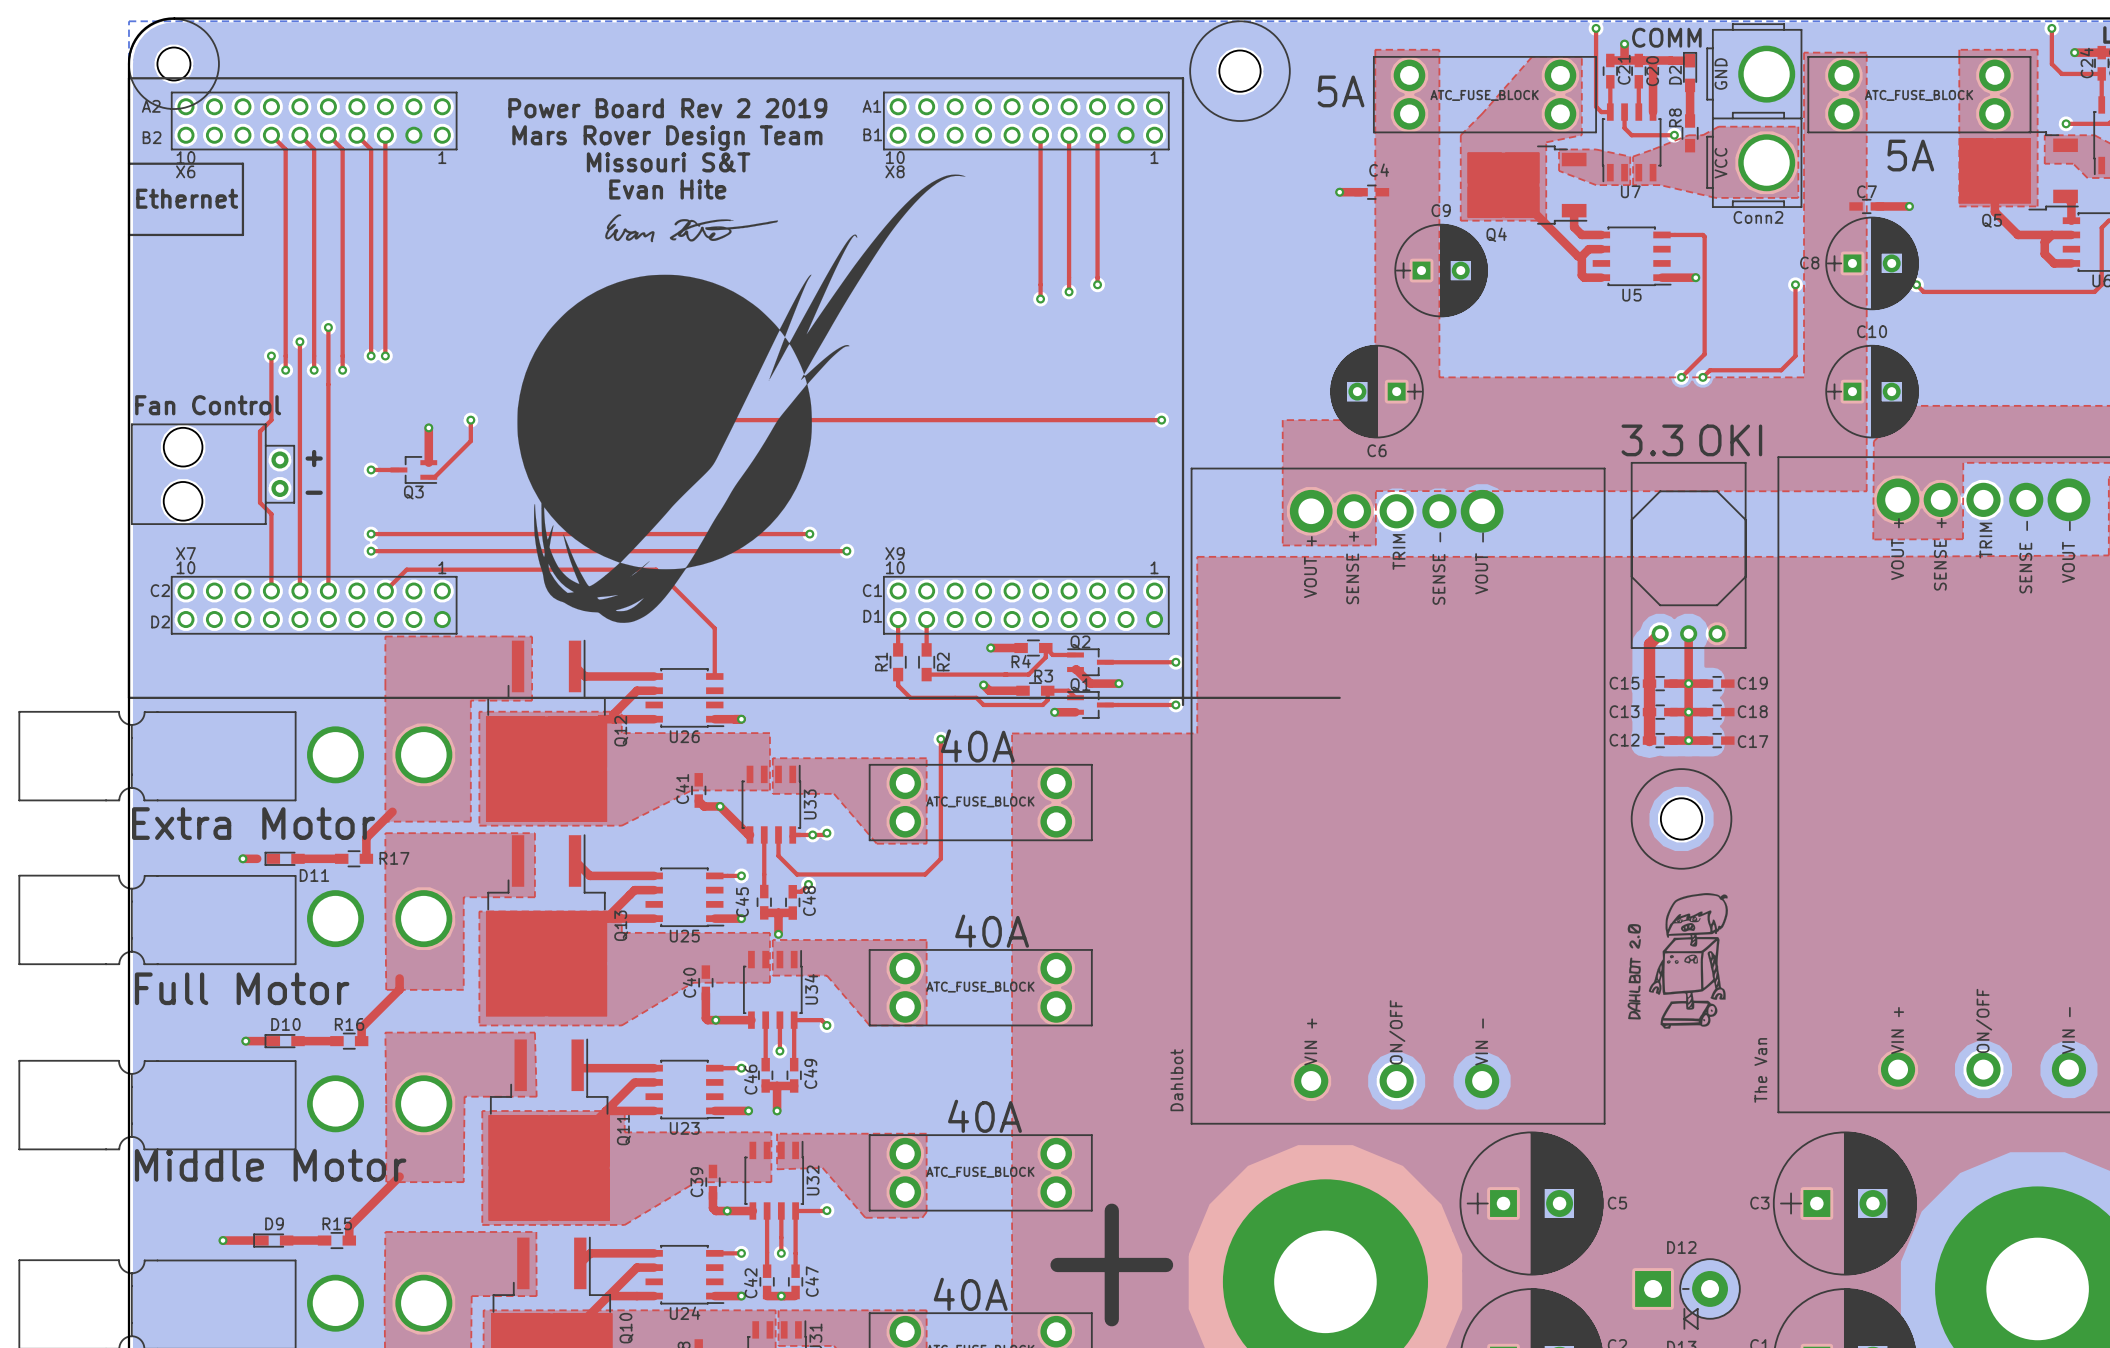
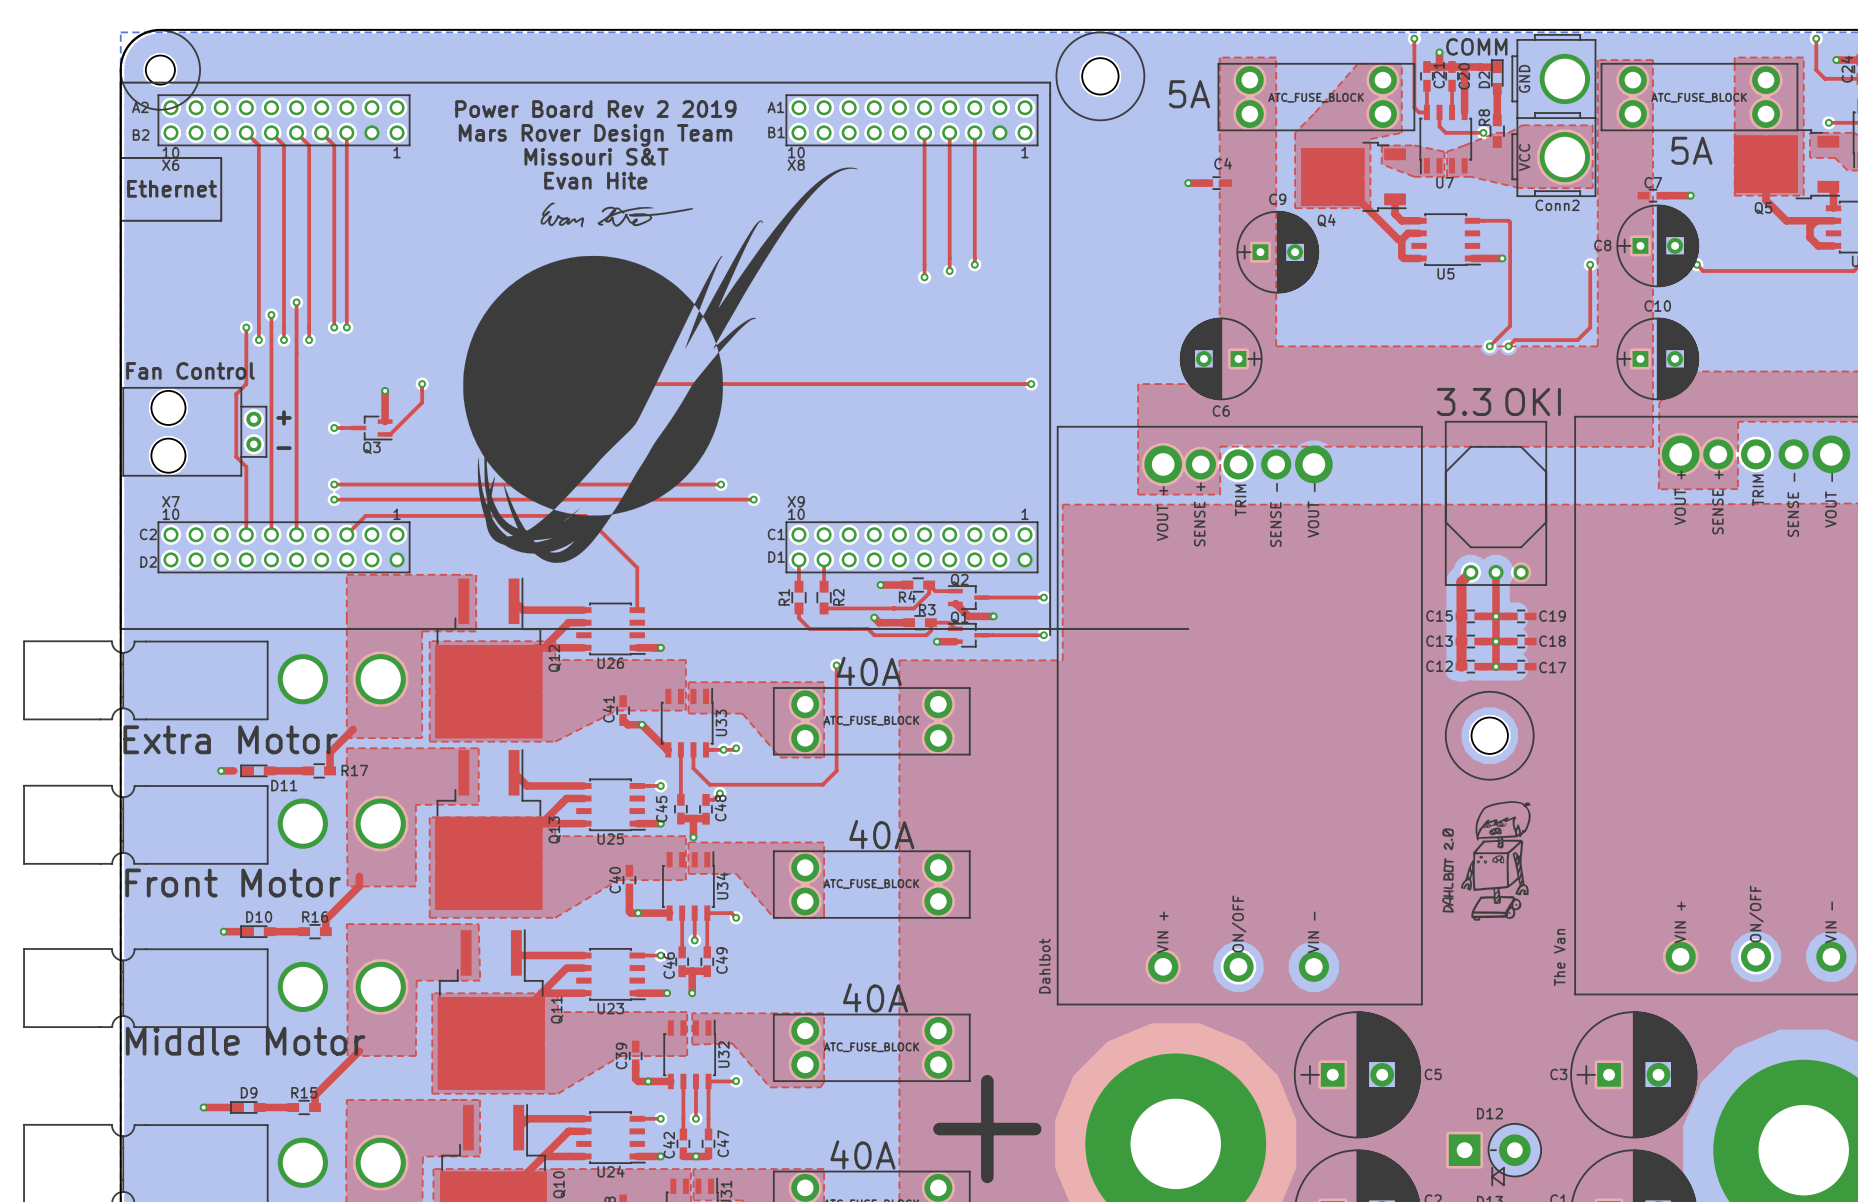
text: Full Motor (242, 988) -> Front Motor (233, 882)

